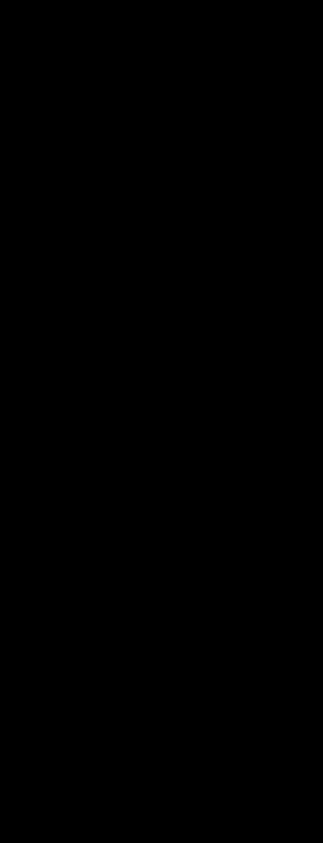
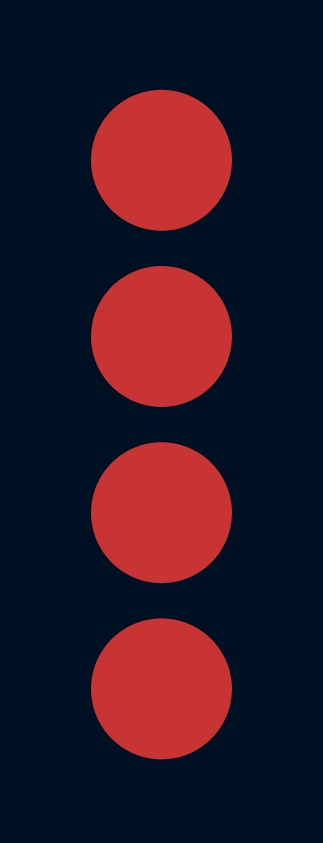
part: none -> (161, 160)
part: none -> (161, 336)
part: none -> (161, 512)
part: none -> (161, 688)

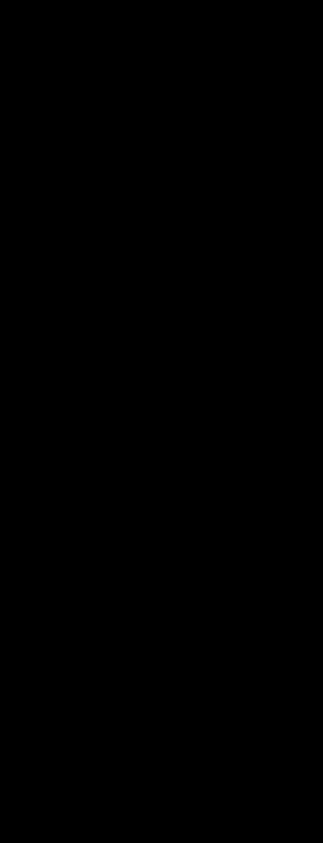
part: (161, 160) -> none
part: (161, 336) -> none
part: (161, 512) -> none
part: (161, 688) -> none

